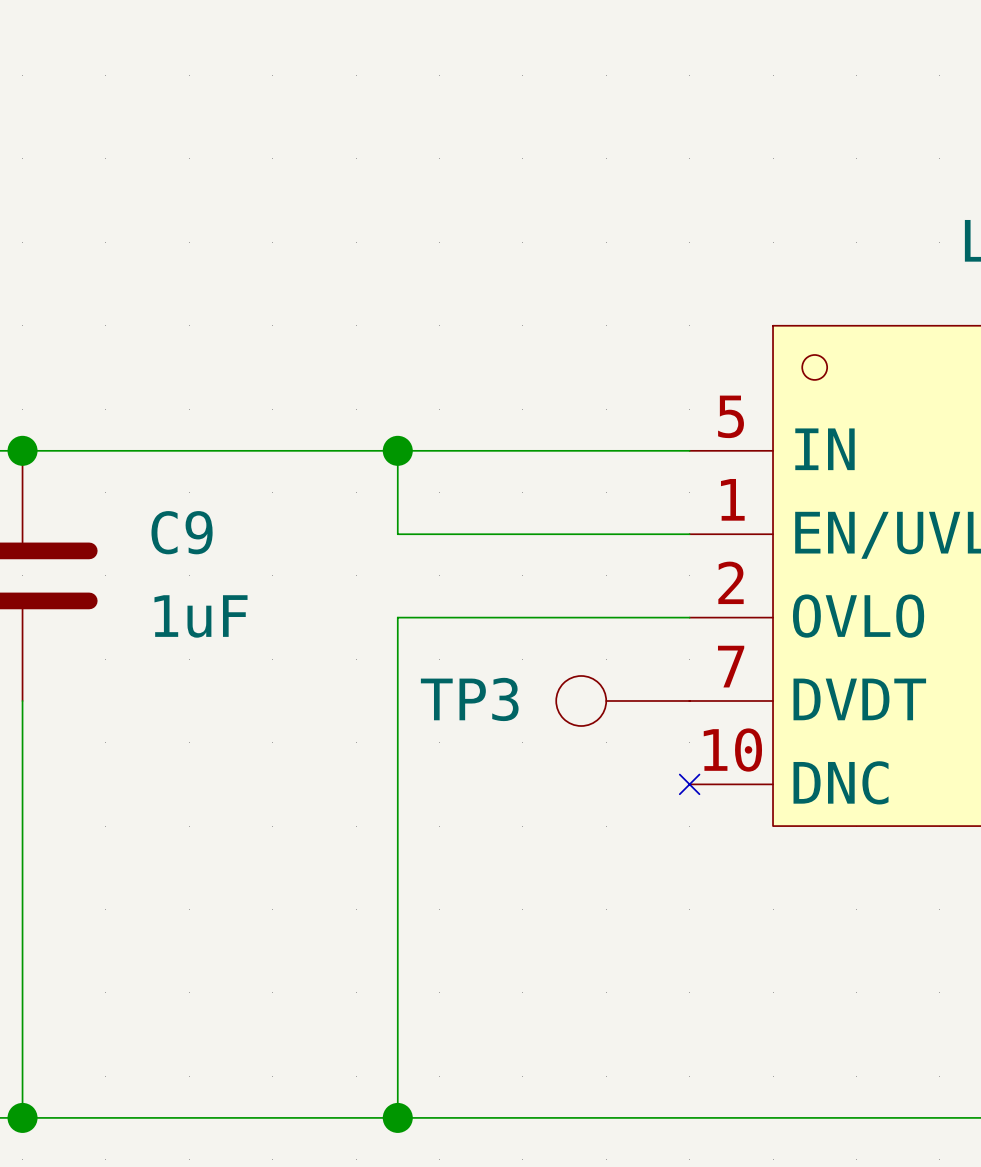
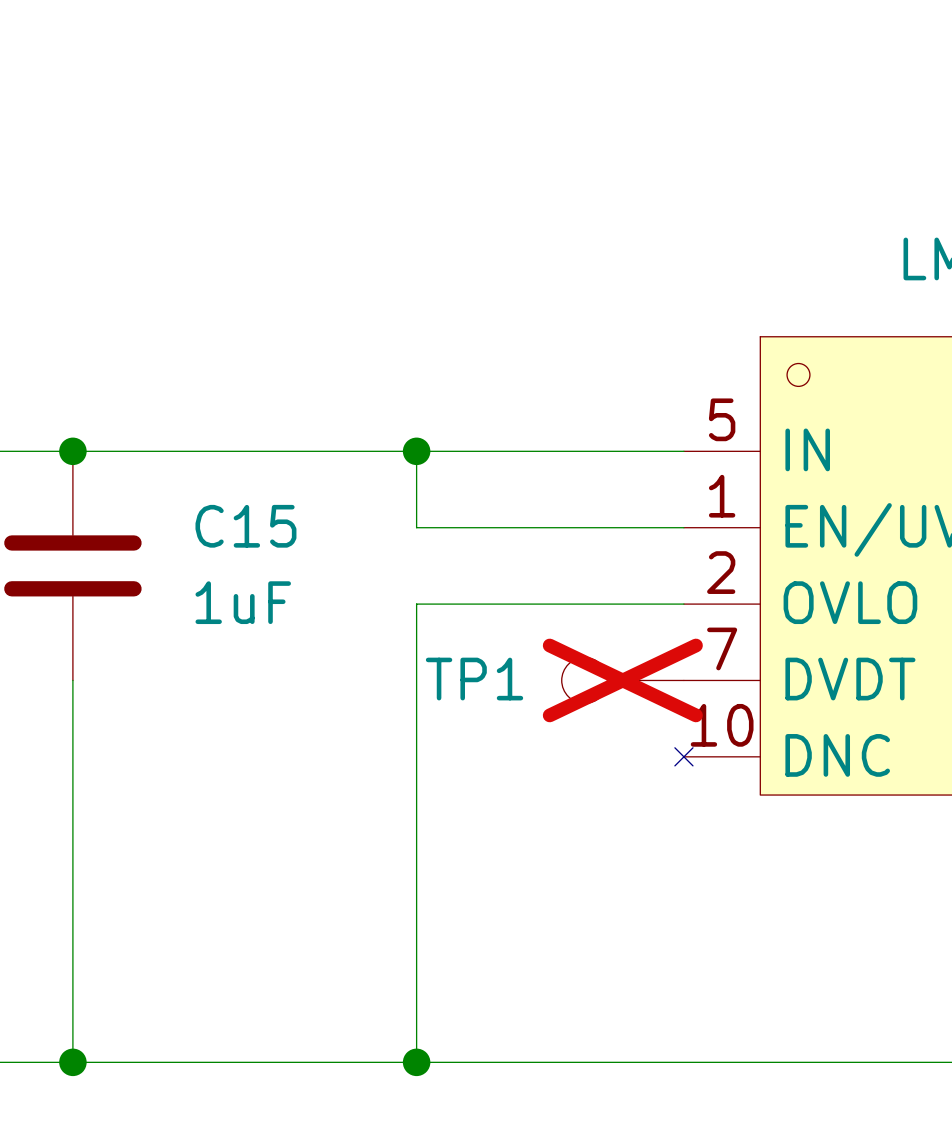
C9 name: C9 (182, 532) -> C15 (245, 526)
TP3 name: TP3 (469, 699) -> TP1 (474, 679)
TP3 do-not-place cross: none -> (622, 680)

